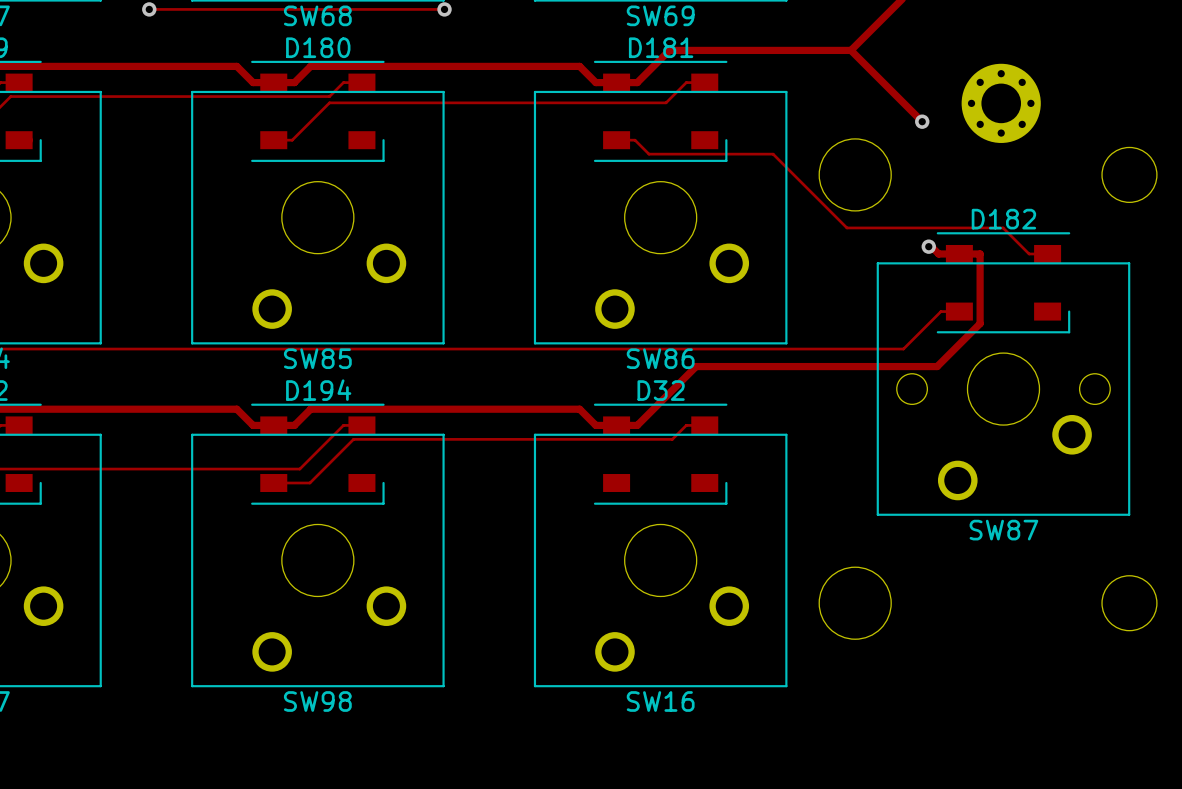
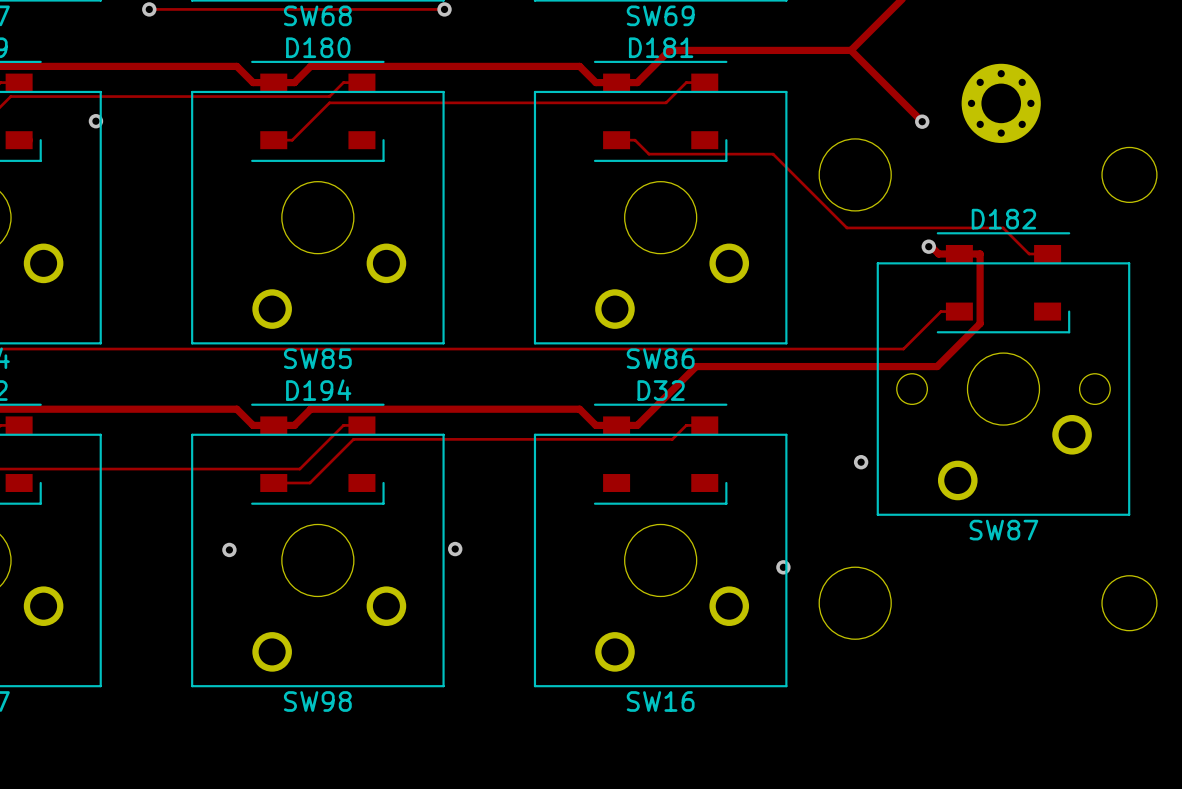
via: none -> (95, 121)
via: none -> (861, 462)
via: none -> (229, 549)
via: none -> (455, 549)
via: none -> (783, 567)

